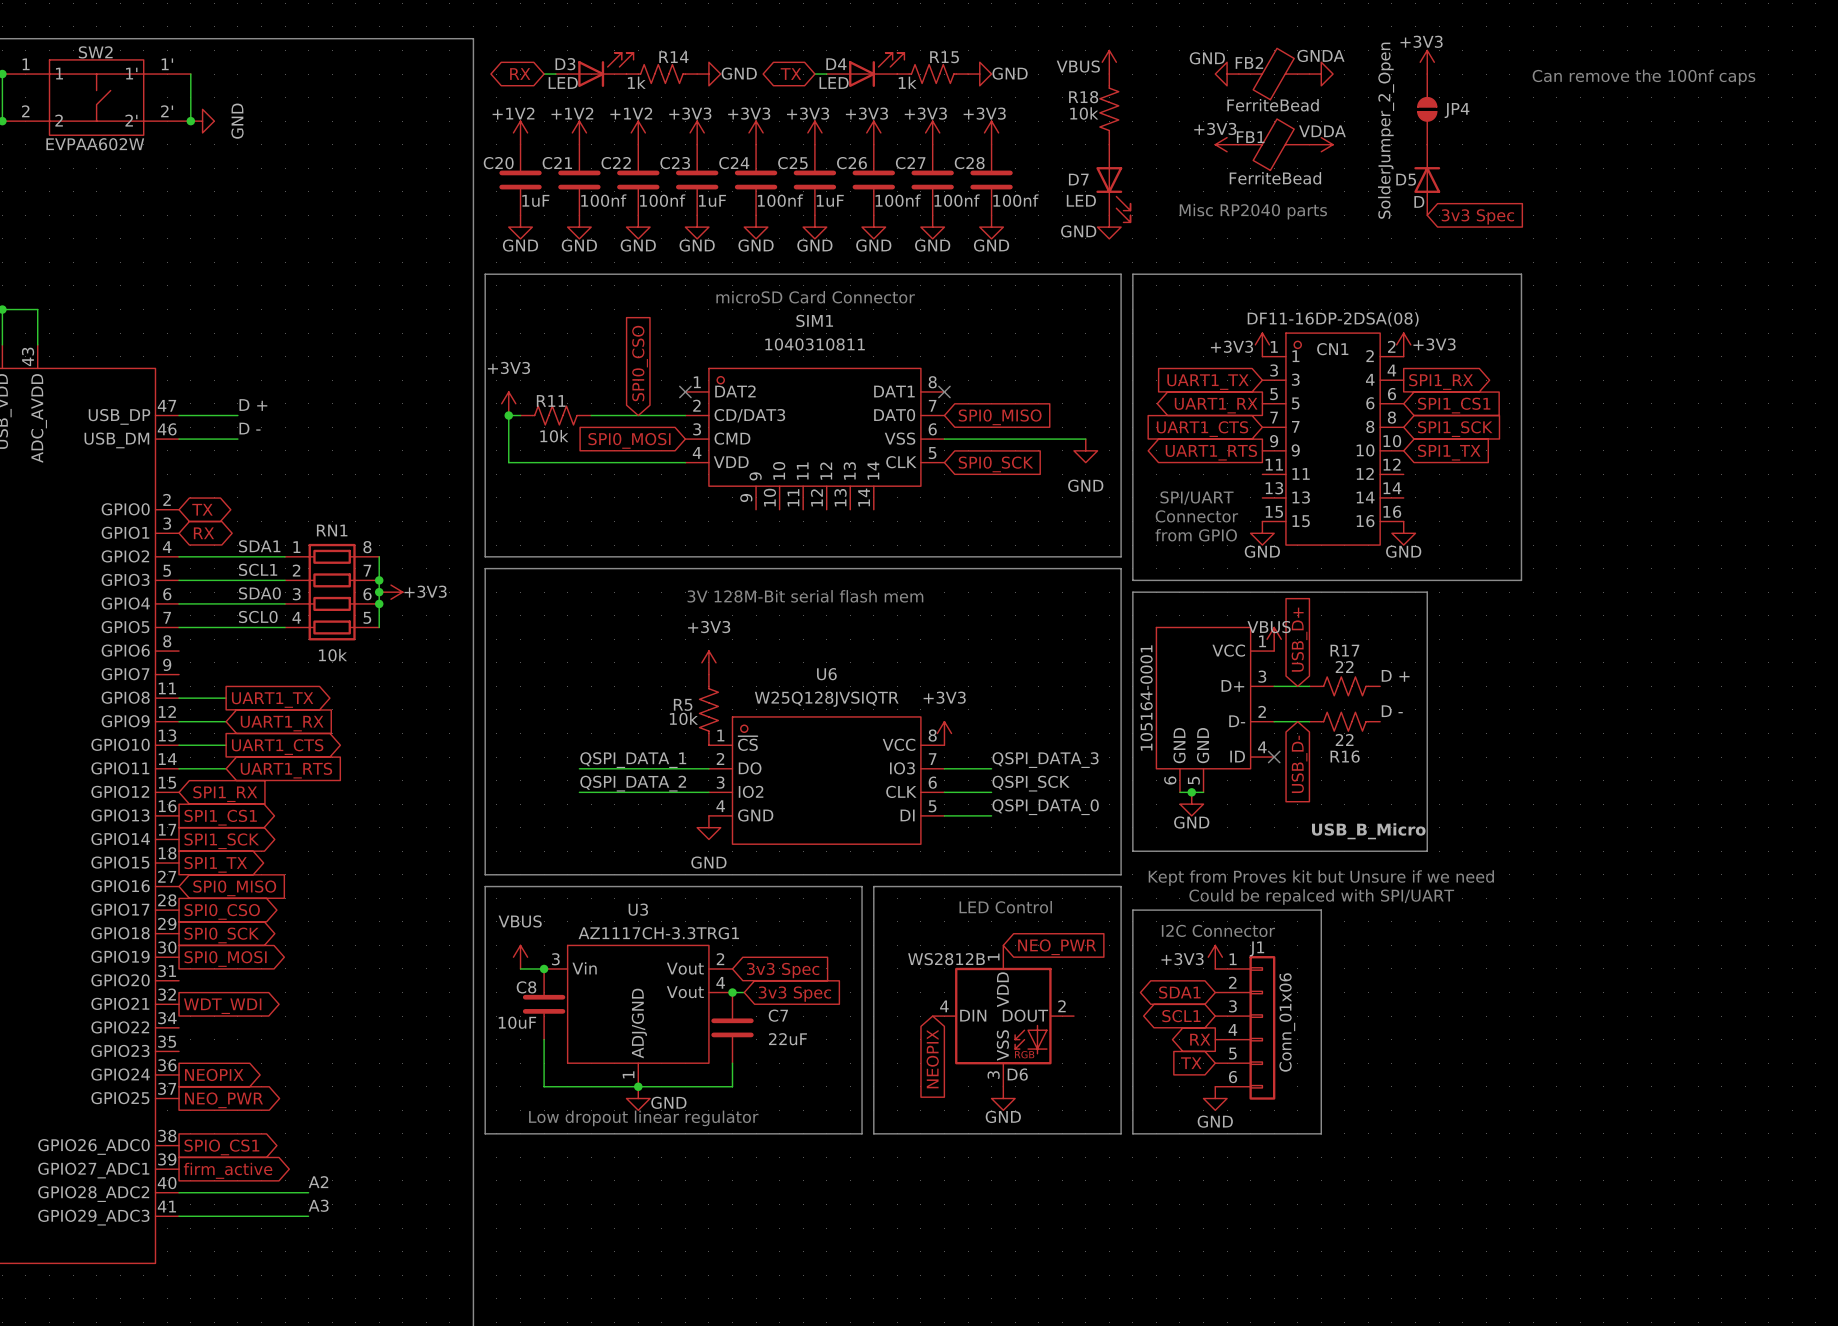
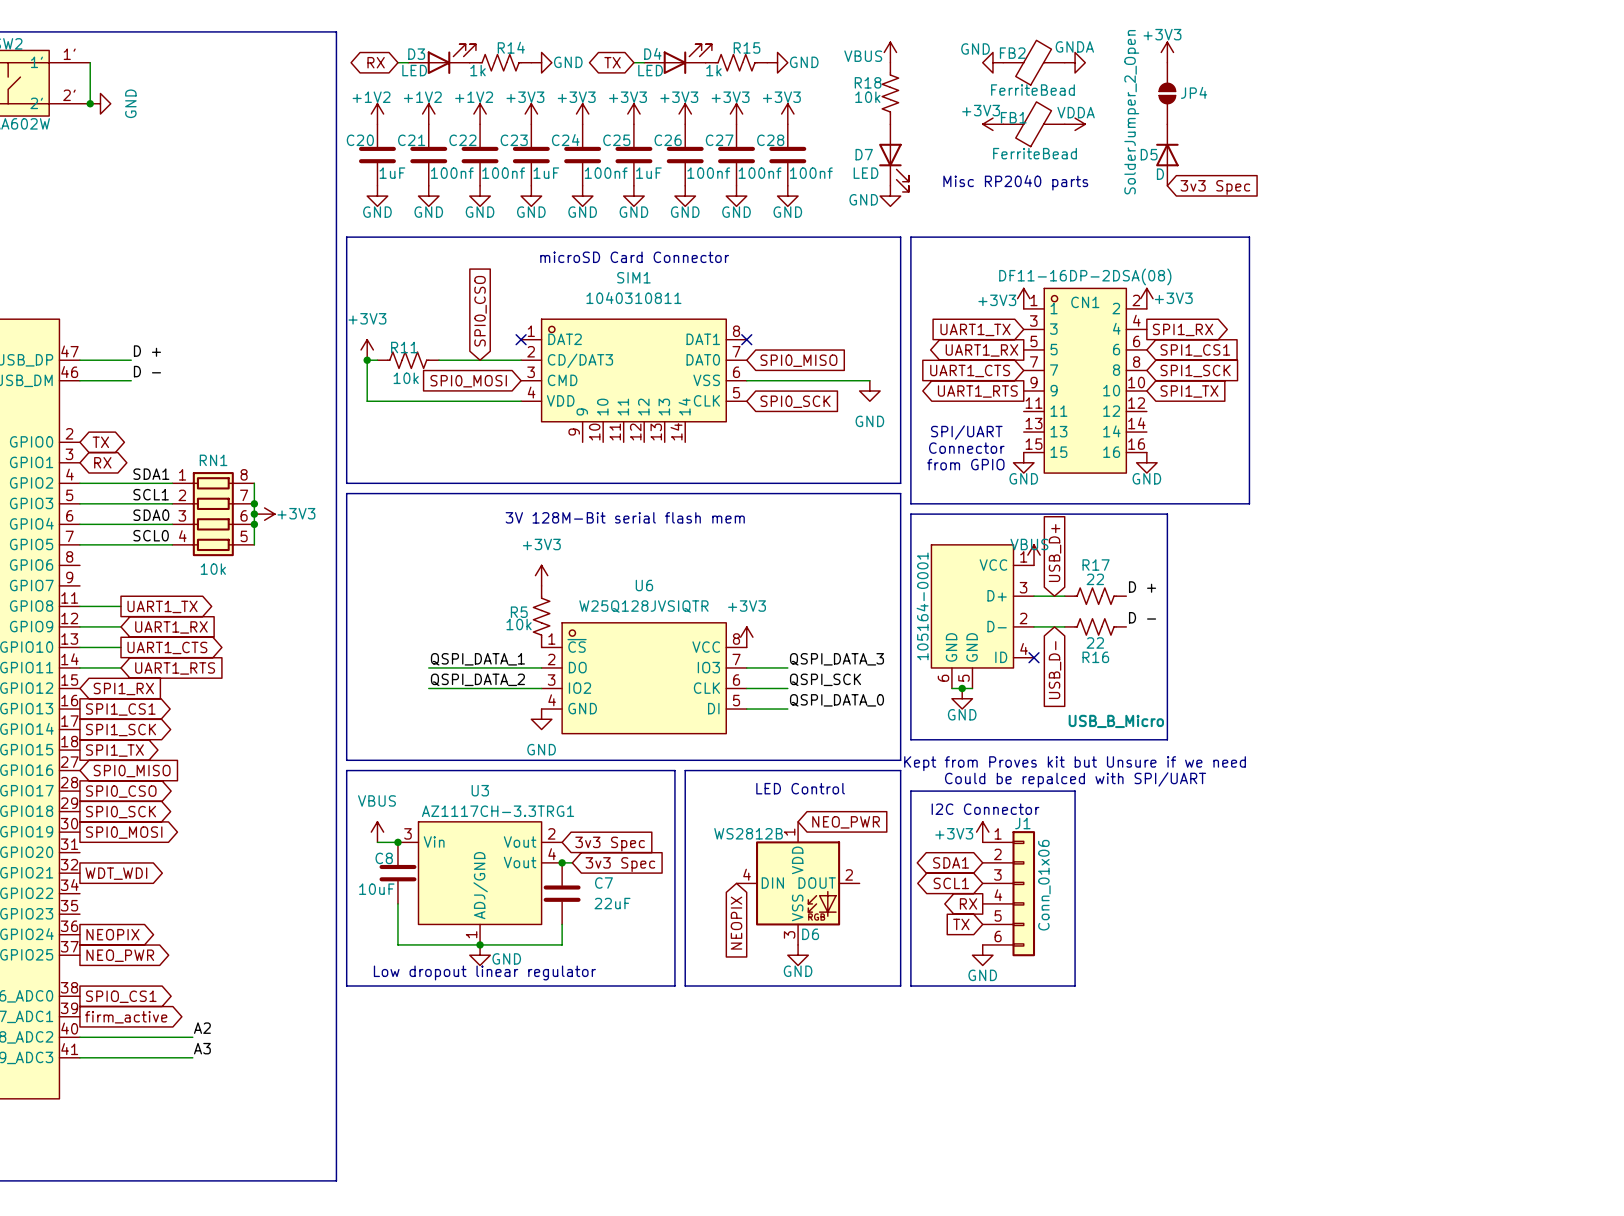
text: Can remove the 100nf caps (1643, 77) -> none

